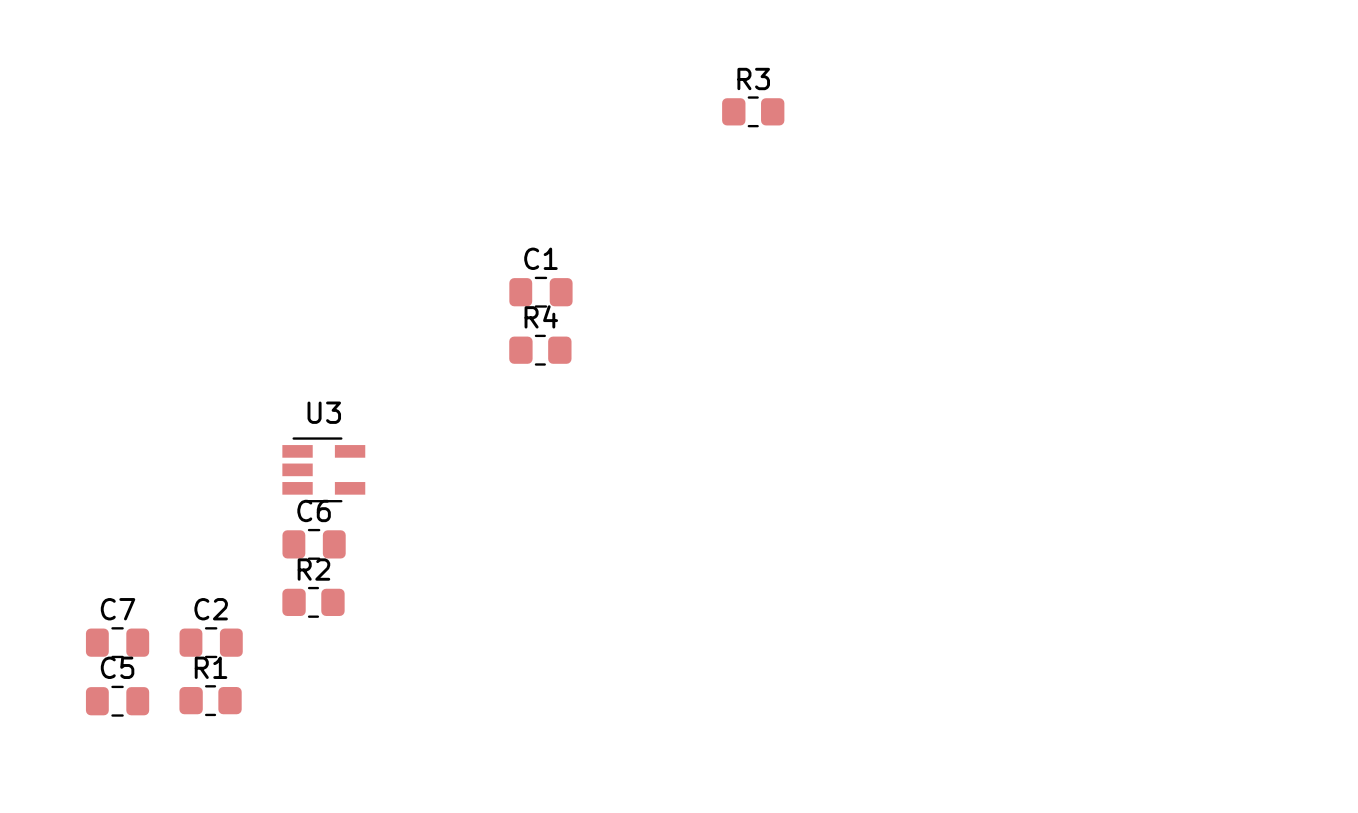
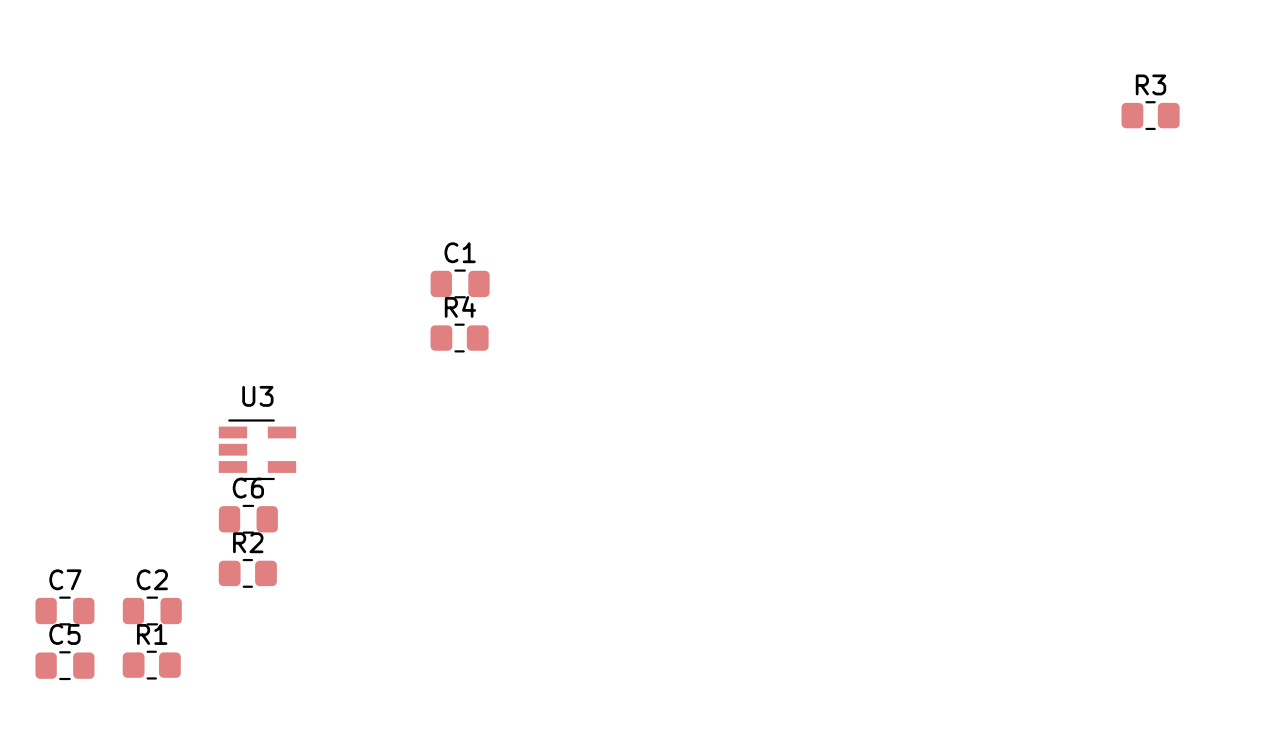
R3 position: (753, 111) -> (1150, 115)

